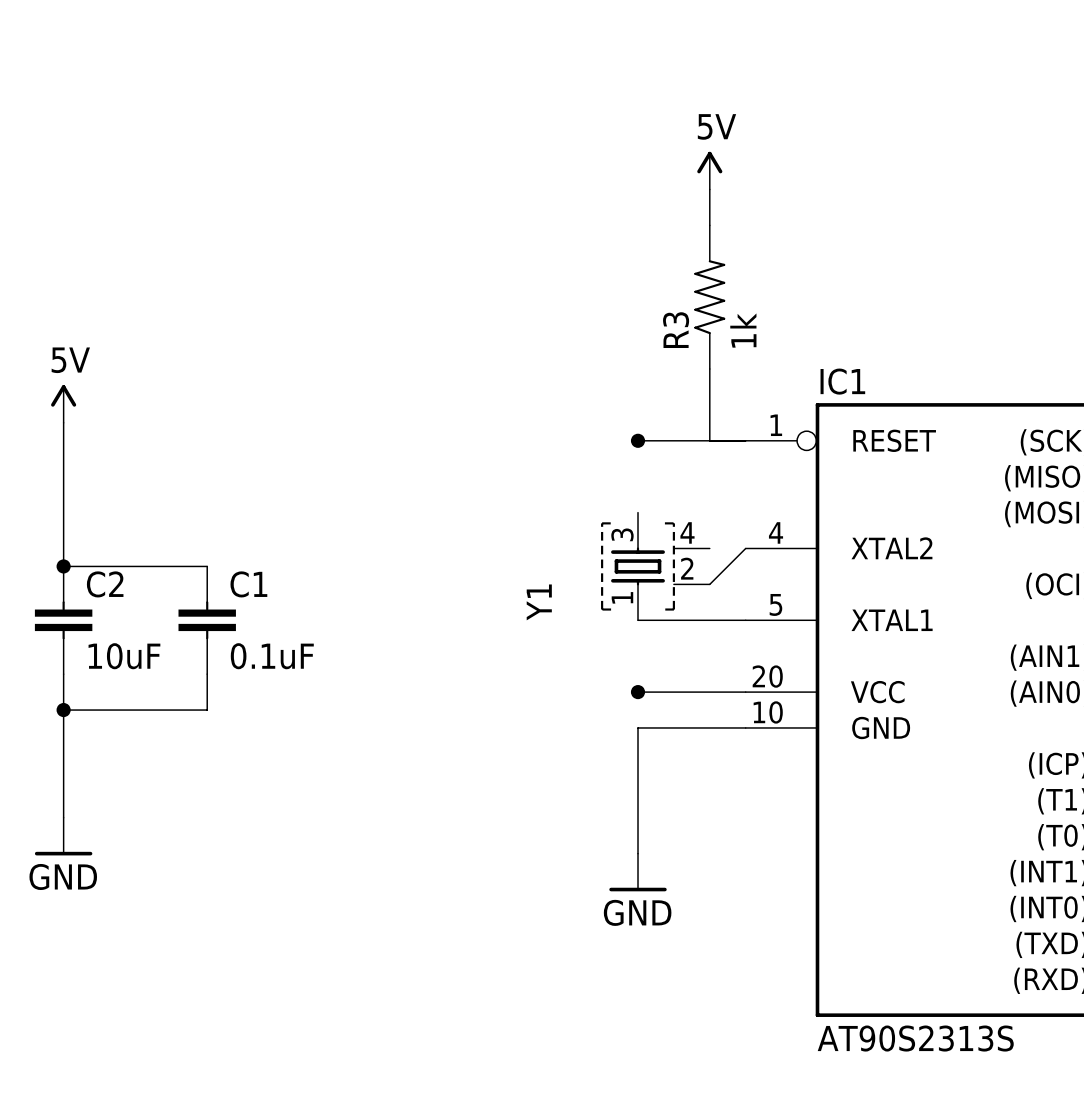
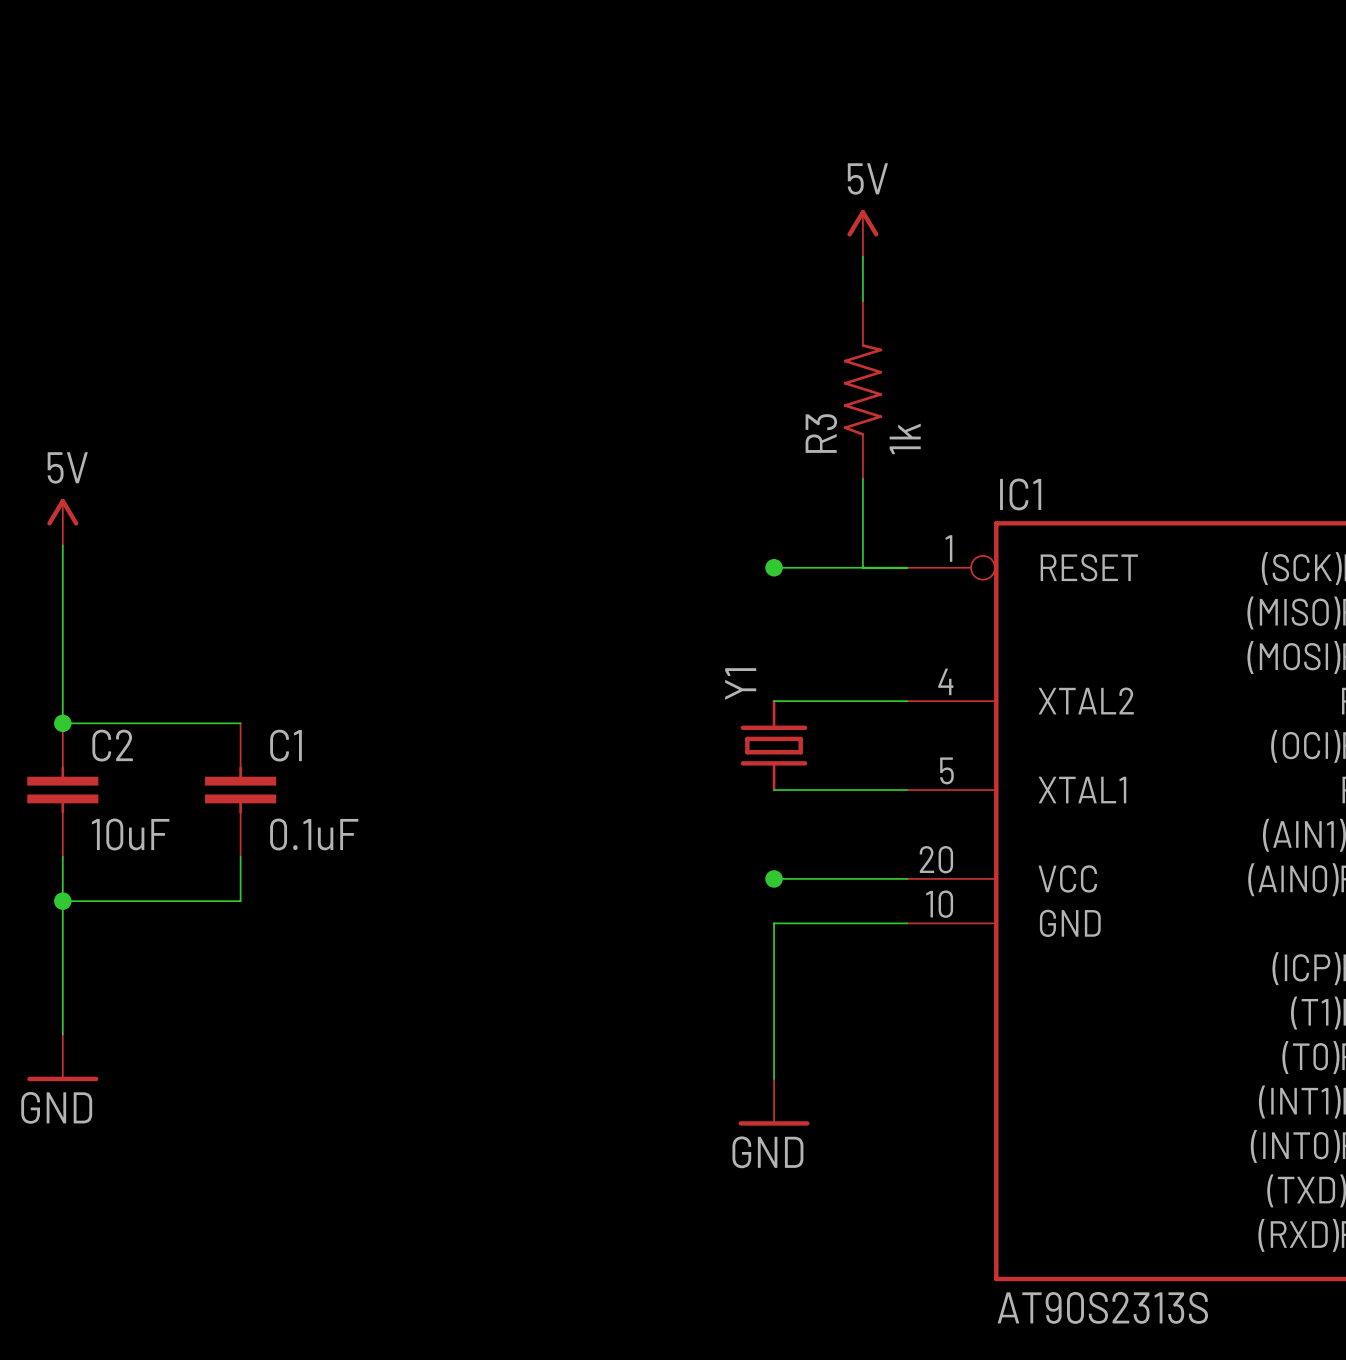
Y1 symbol: [601, 512, 710, 621] -> [740, 699, 808, 792]
wire: (745, 548) (709, 584) -> (907, 701) (774, 701)
Y1 name position: Y1 (539, 602) -> Y1 (740, 683)

